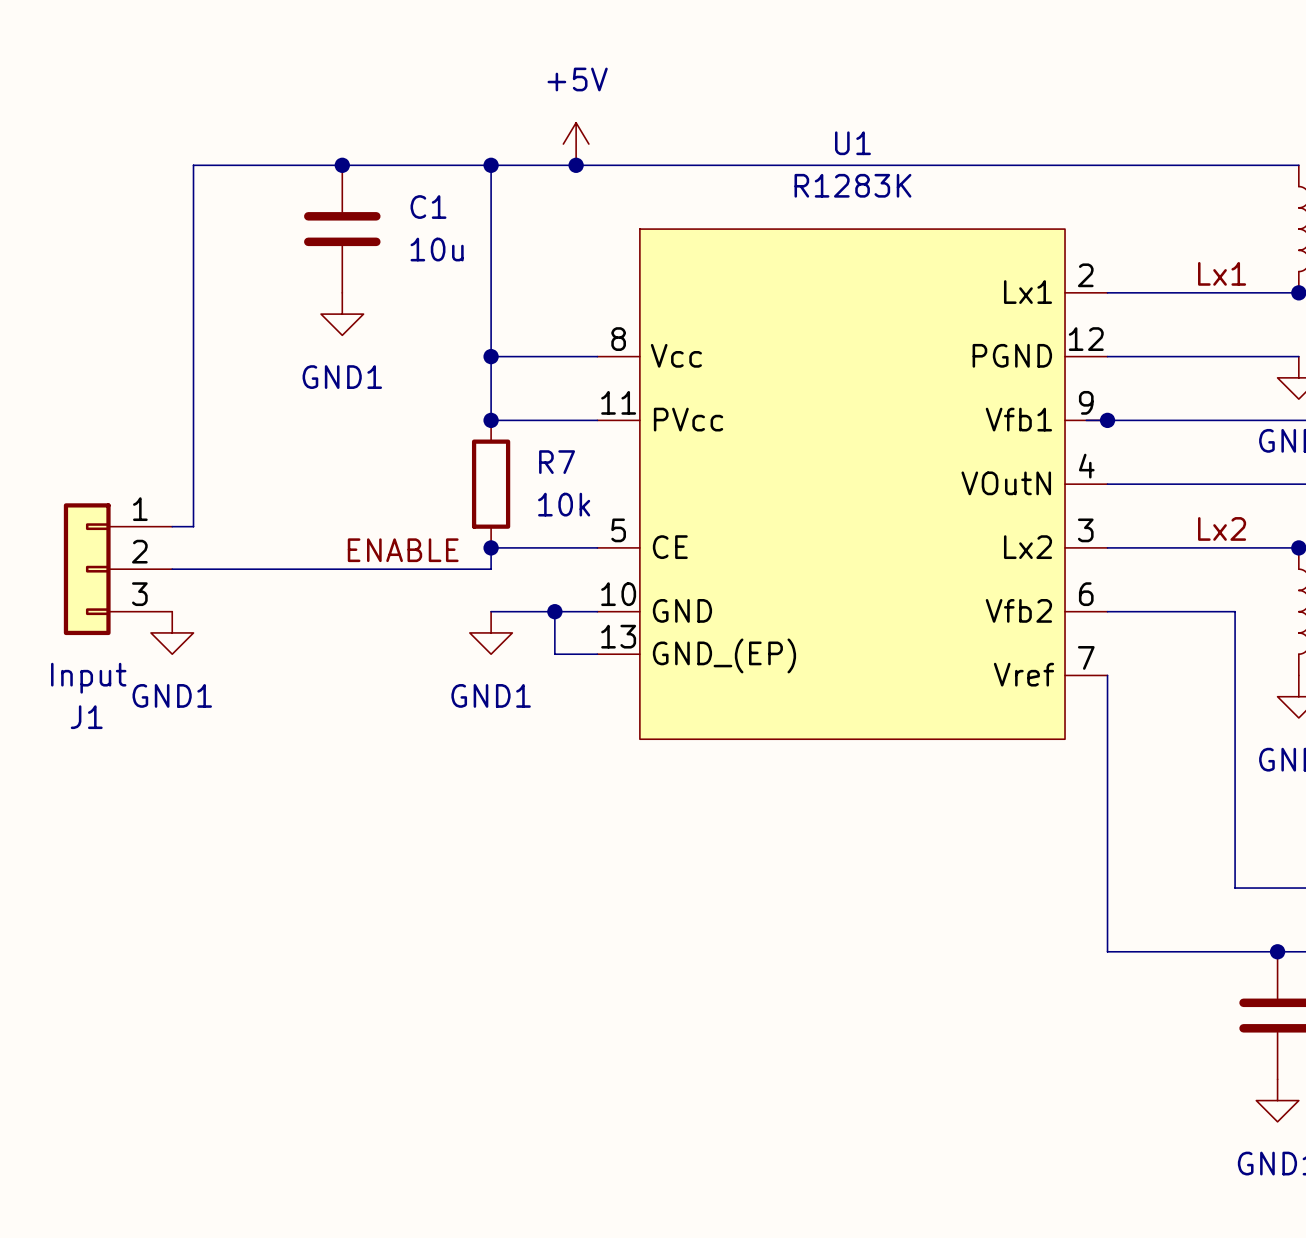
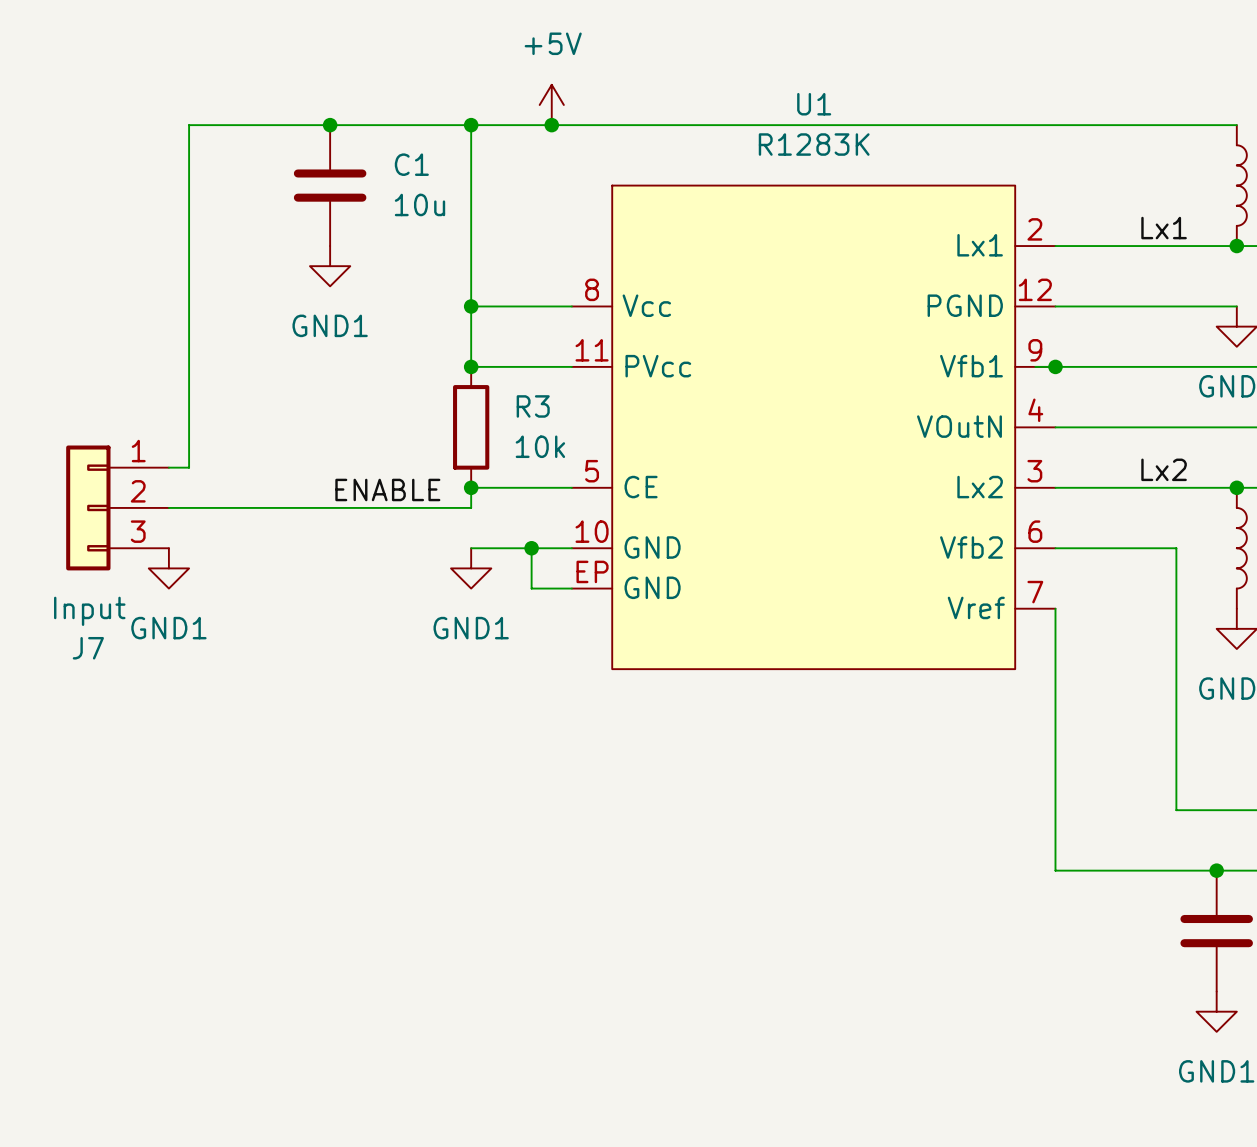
R7 name: R7 (557, 462) -> R3 (533, 406)
U1 pin number: 13 (618, 636) -> EP (592, 571)
U1 pin name: GND_(EP) (724, 655) -> GND (652, 587)
J1 name: J1 (86, 717) -> J7 (88, 648)

